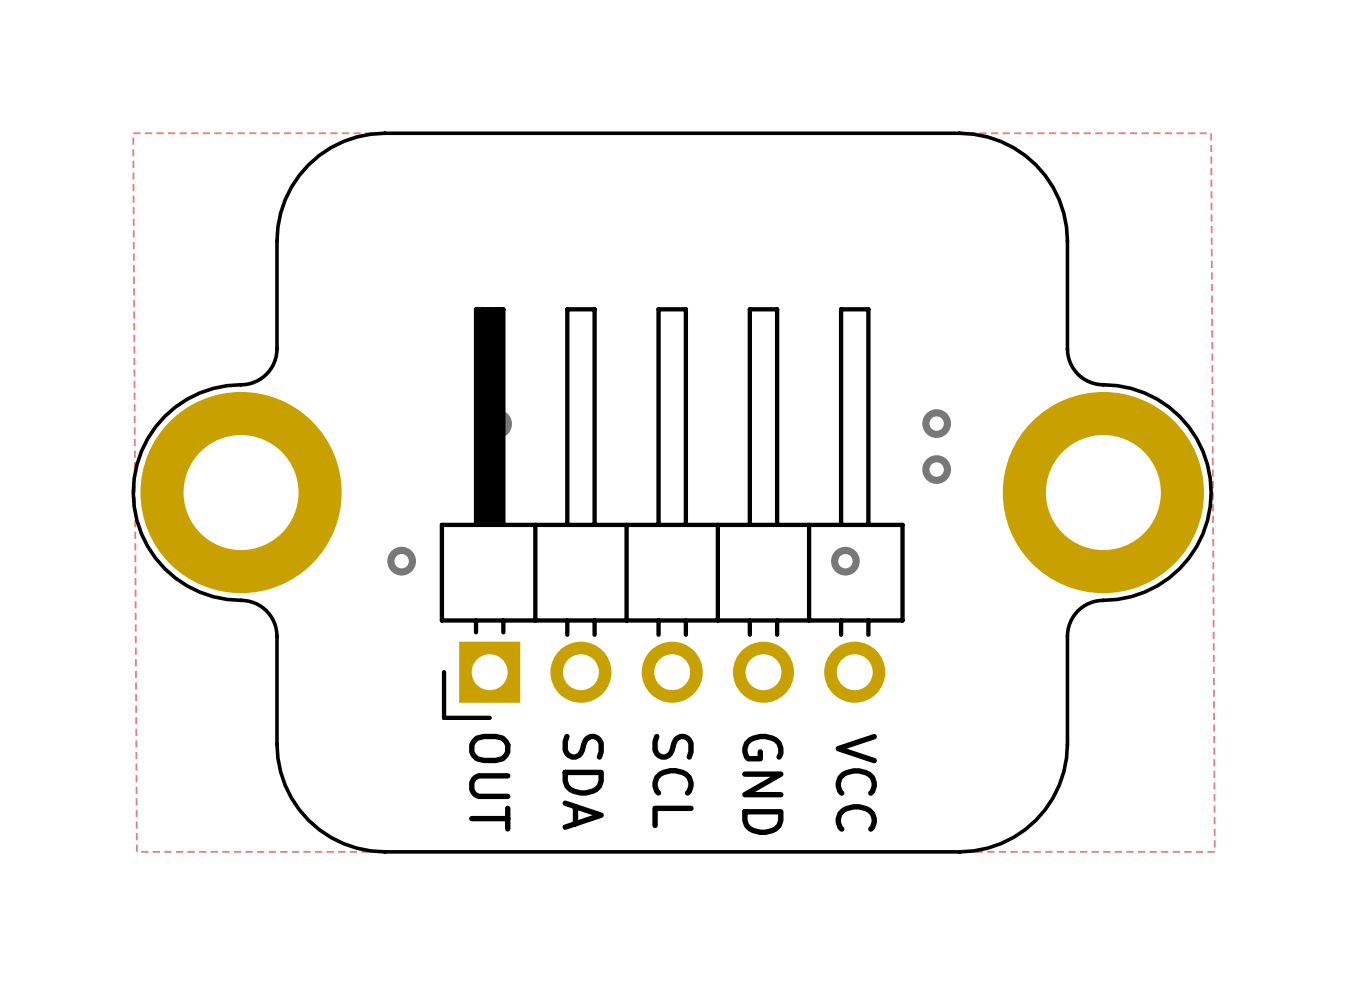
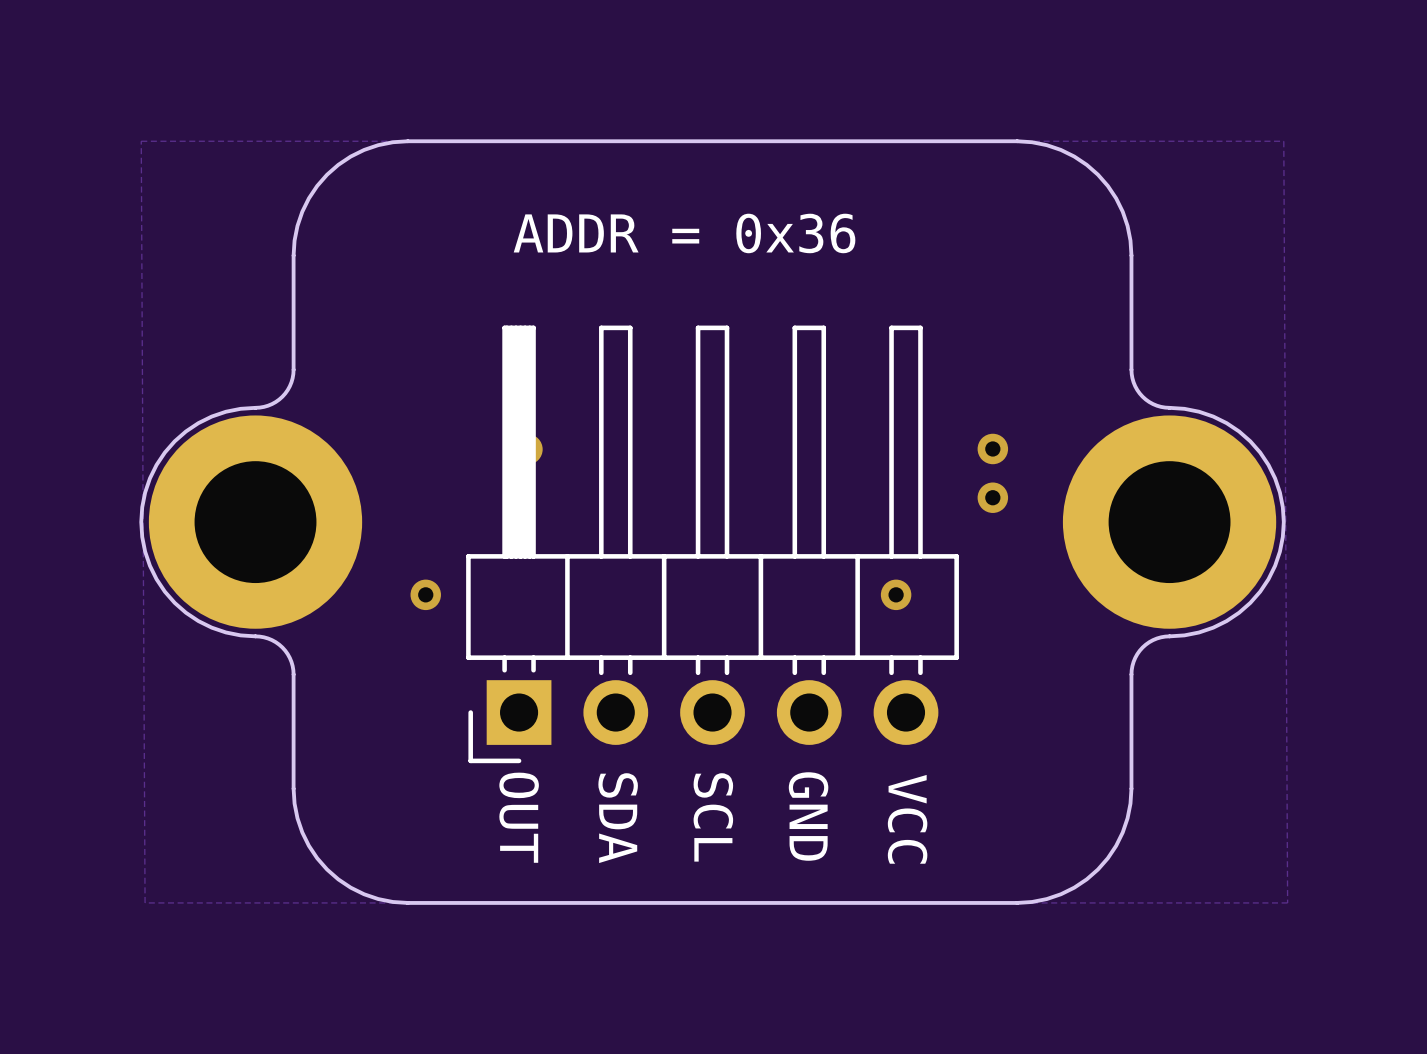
text: none -> ADDR = 0x36 (684, 233)

